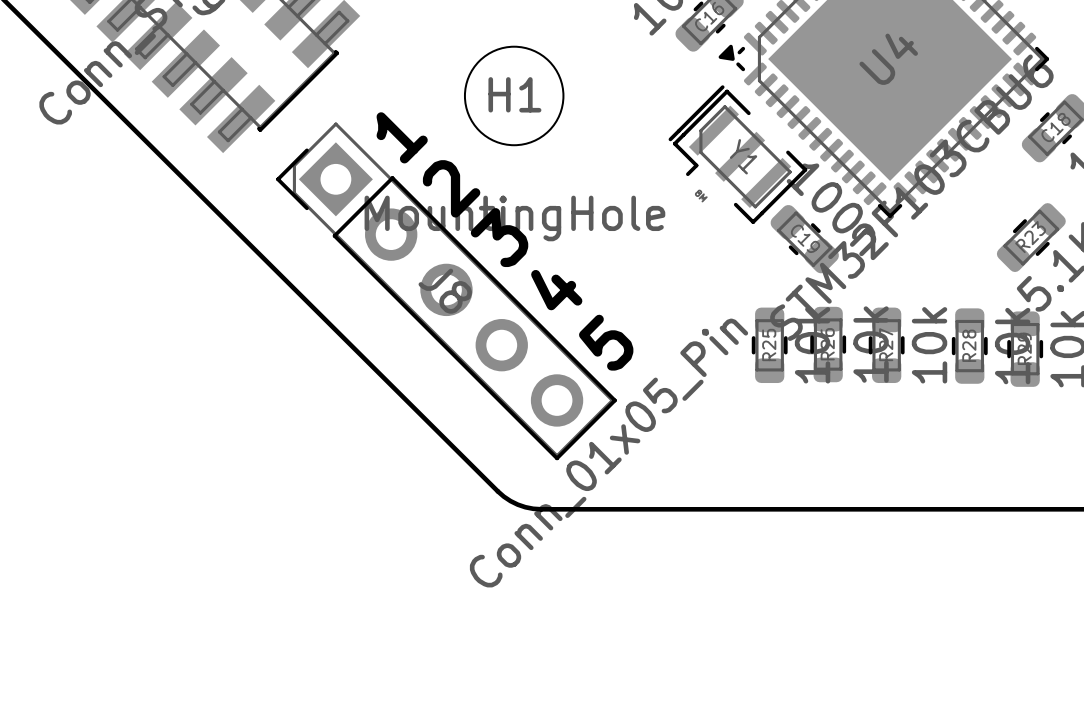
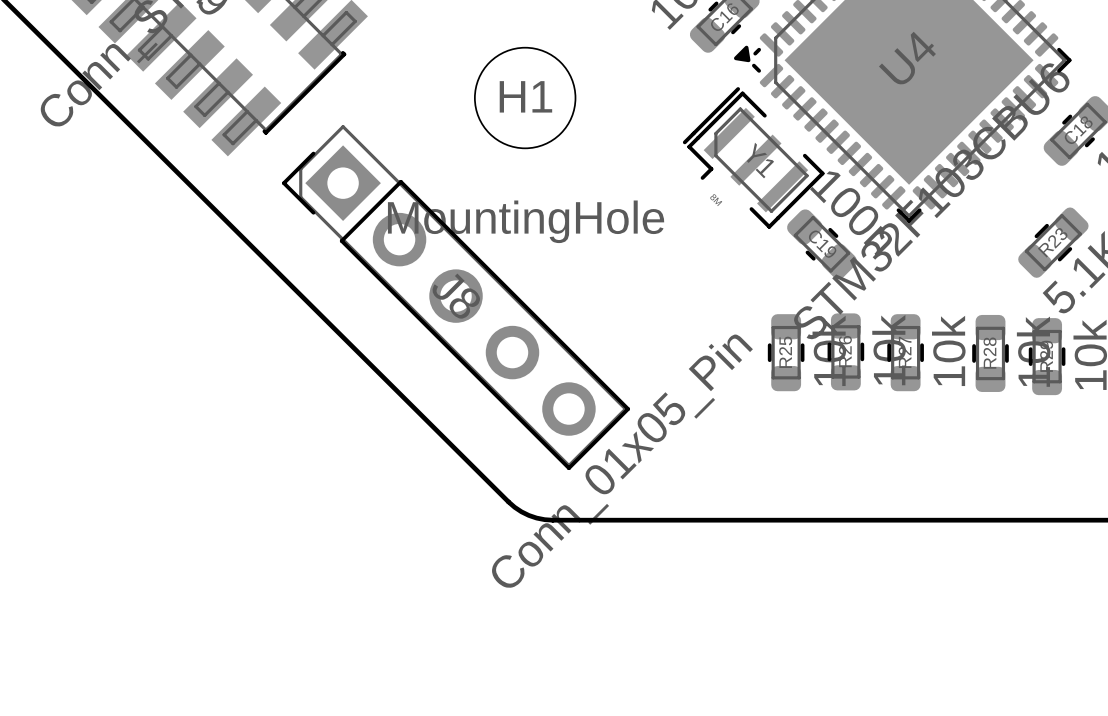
text: 1 (402, 137) -> none
text: 2 (451, 188) -> none
text: 3 (499, 237) -> none
text: 4 (556, 290) -> none
text: 5 (606, 342) -> none

